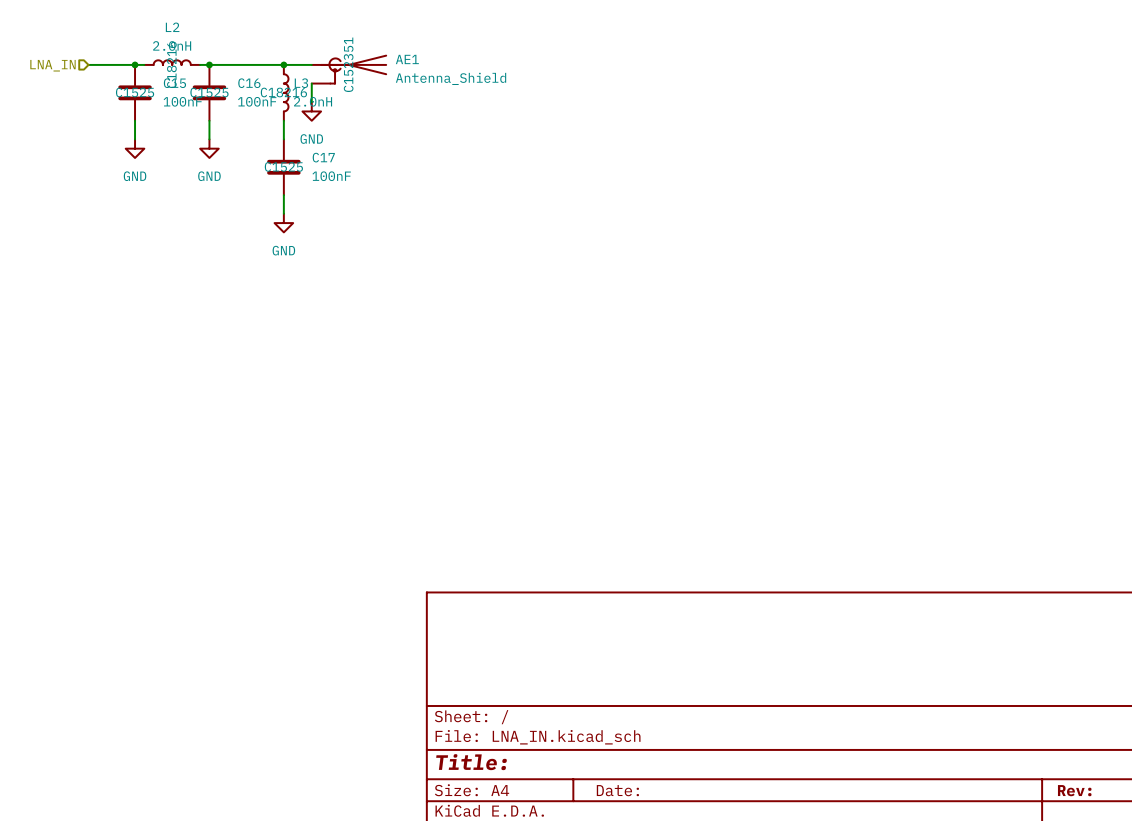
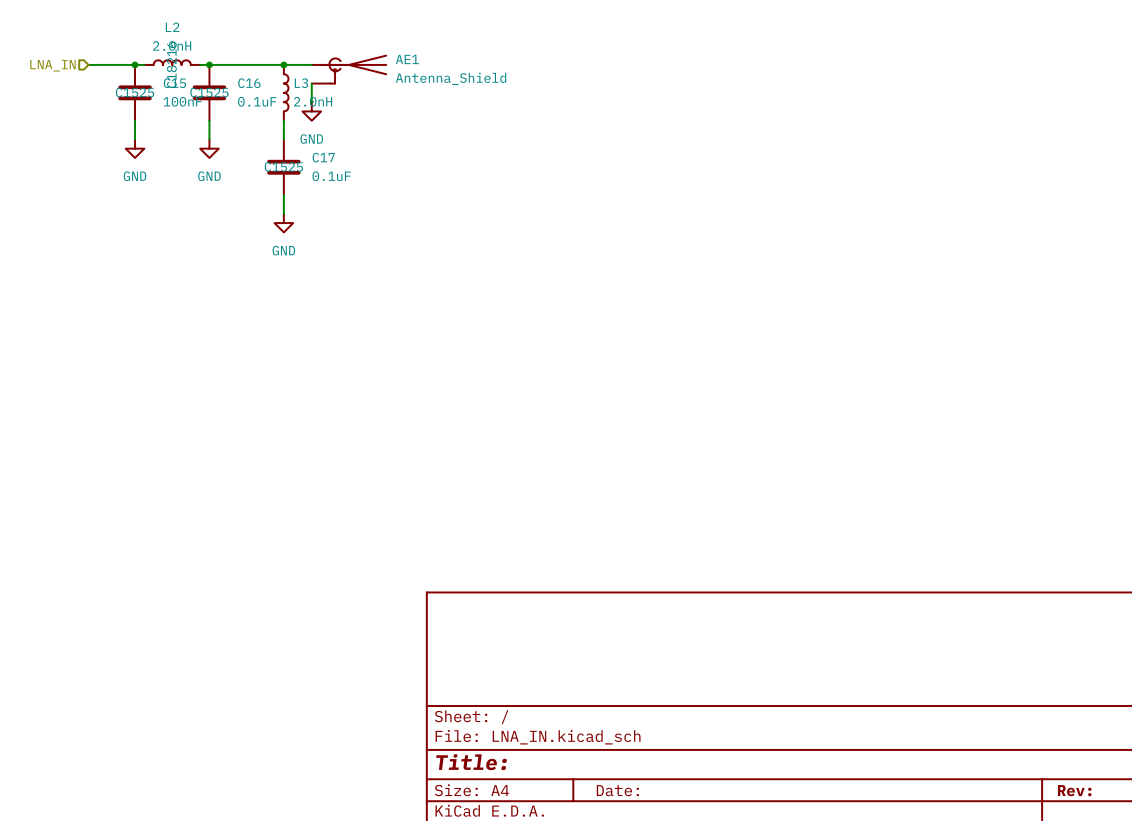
AE1 text: C152351 (348, 64) -> none
L3 text: C18216 (283, 92) -> none
C16 value: 100nF (257, 101) -> 0.1uF (257, 101)
C17 value: 100nF (331, 176) -> 0.1uF (331, 176)

